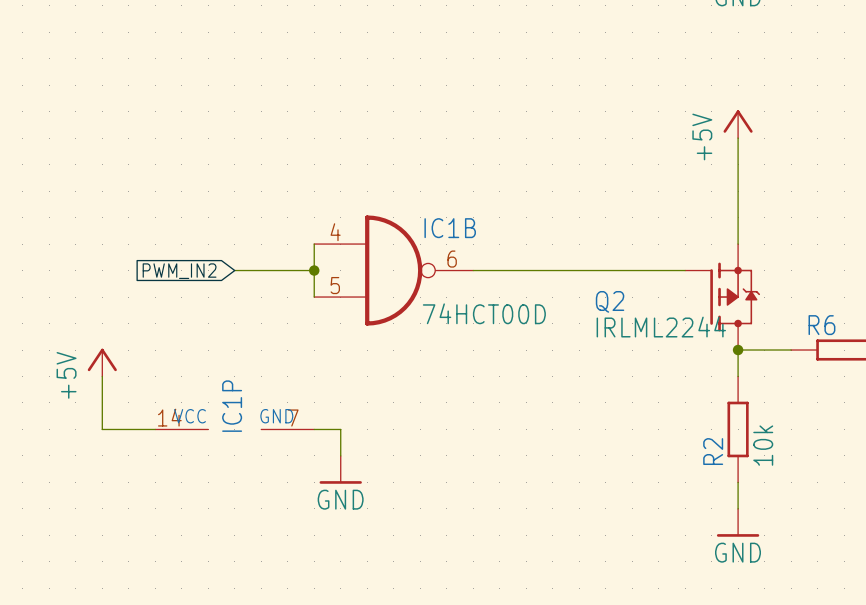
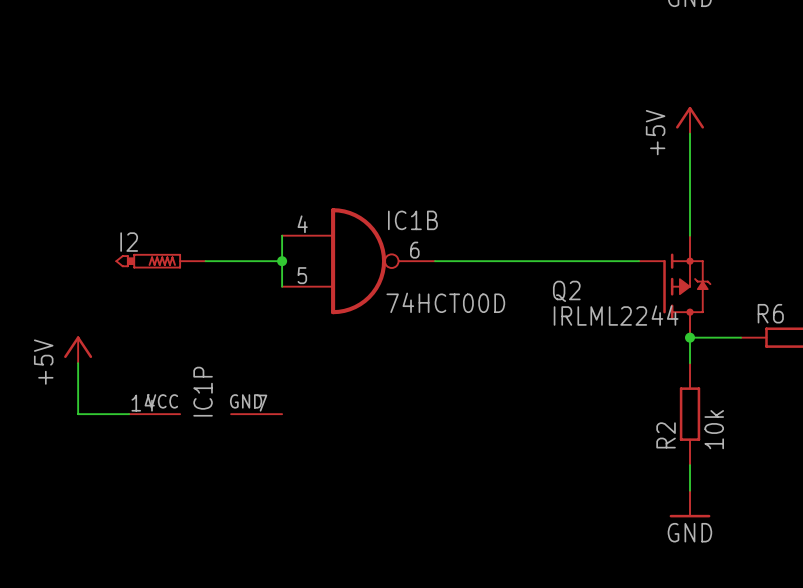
I2: none -> (160, 261)
global label: PWM_IN2 (179, 271) -> none
wire: (314, 429) (340, 429) (340, 455) -> none
power symbol: GND (340, 469) -> none

